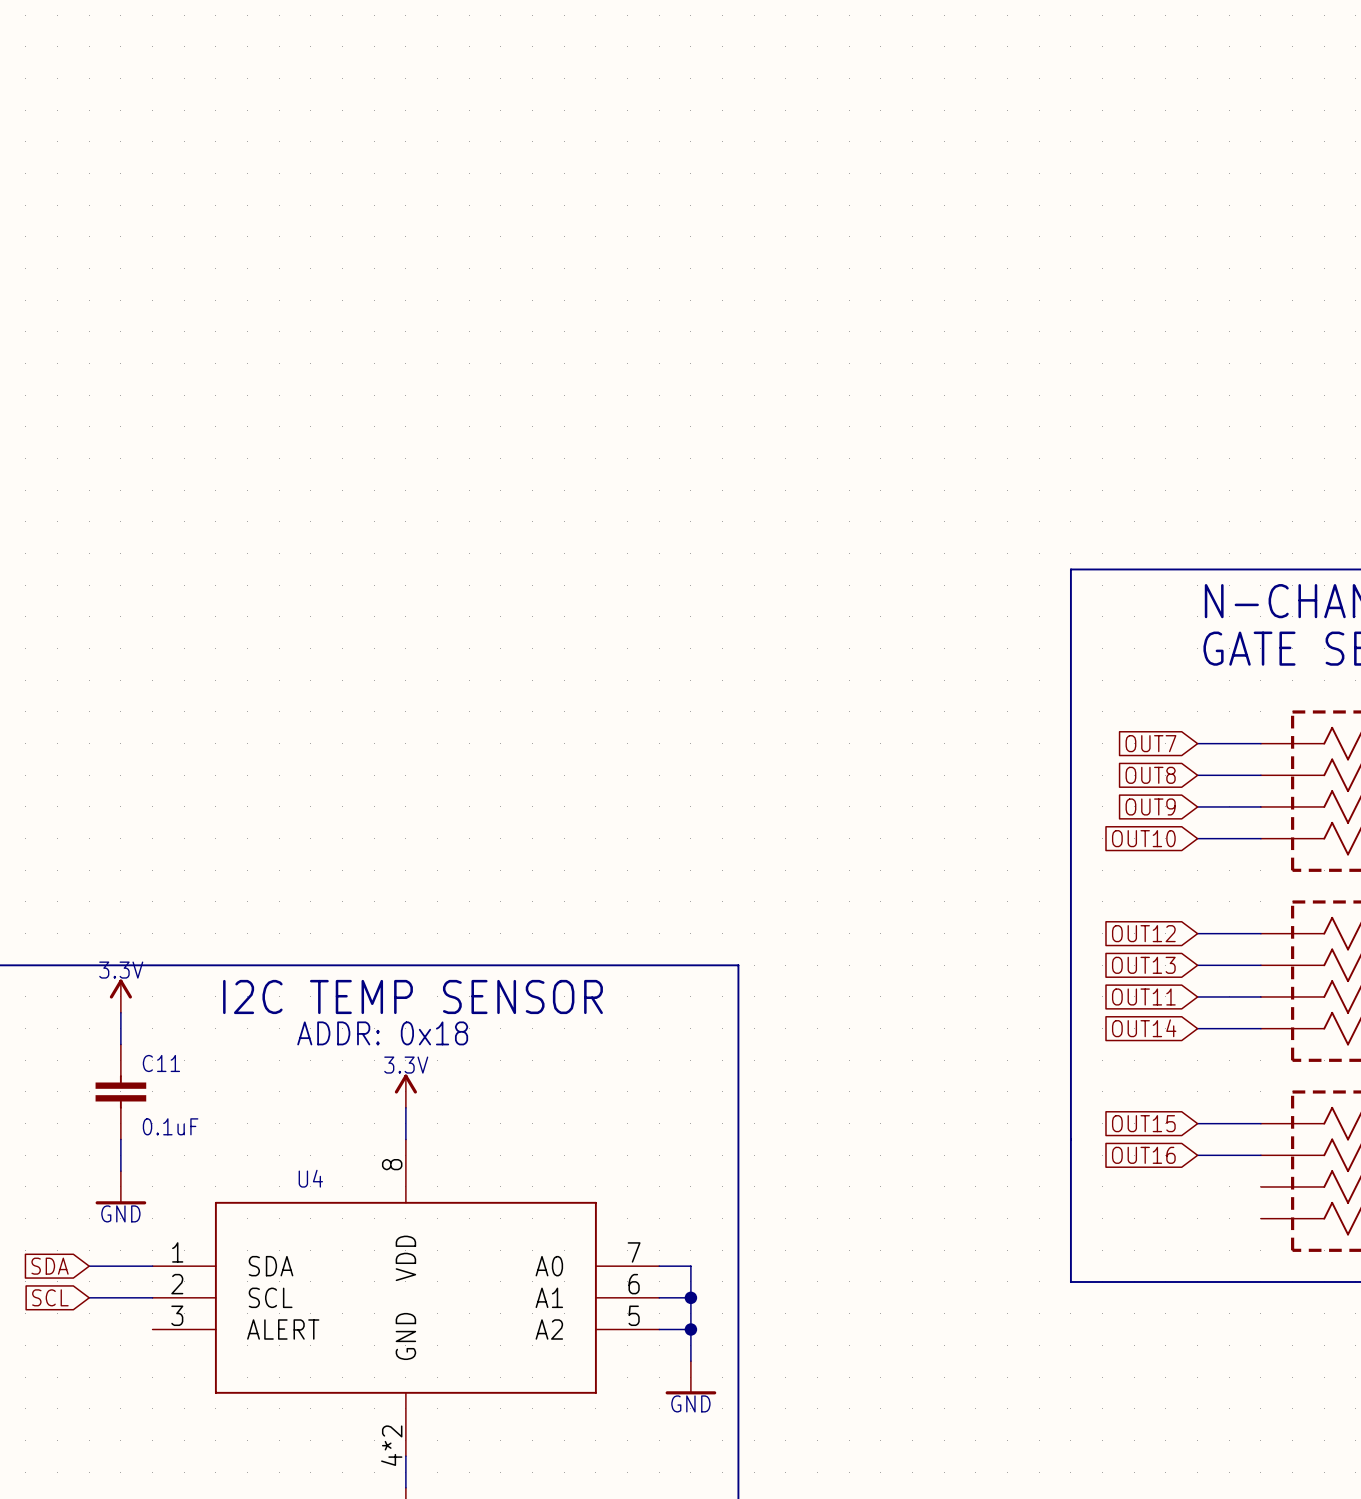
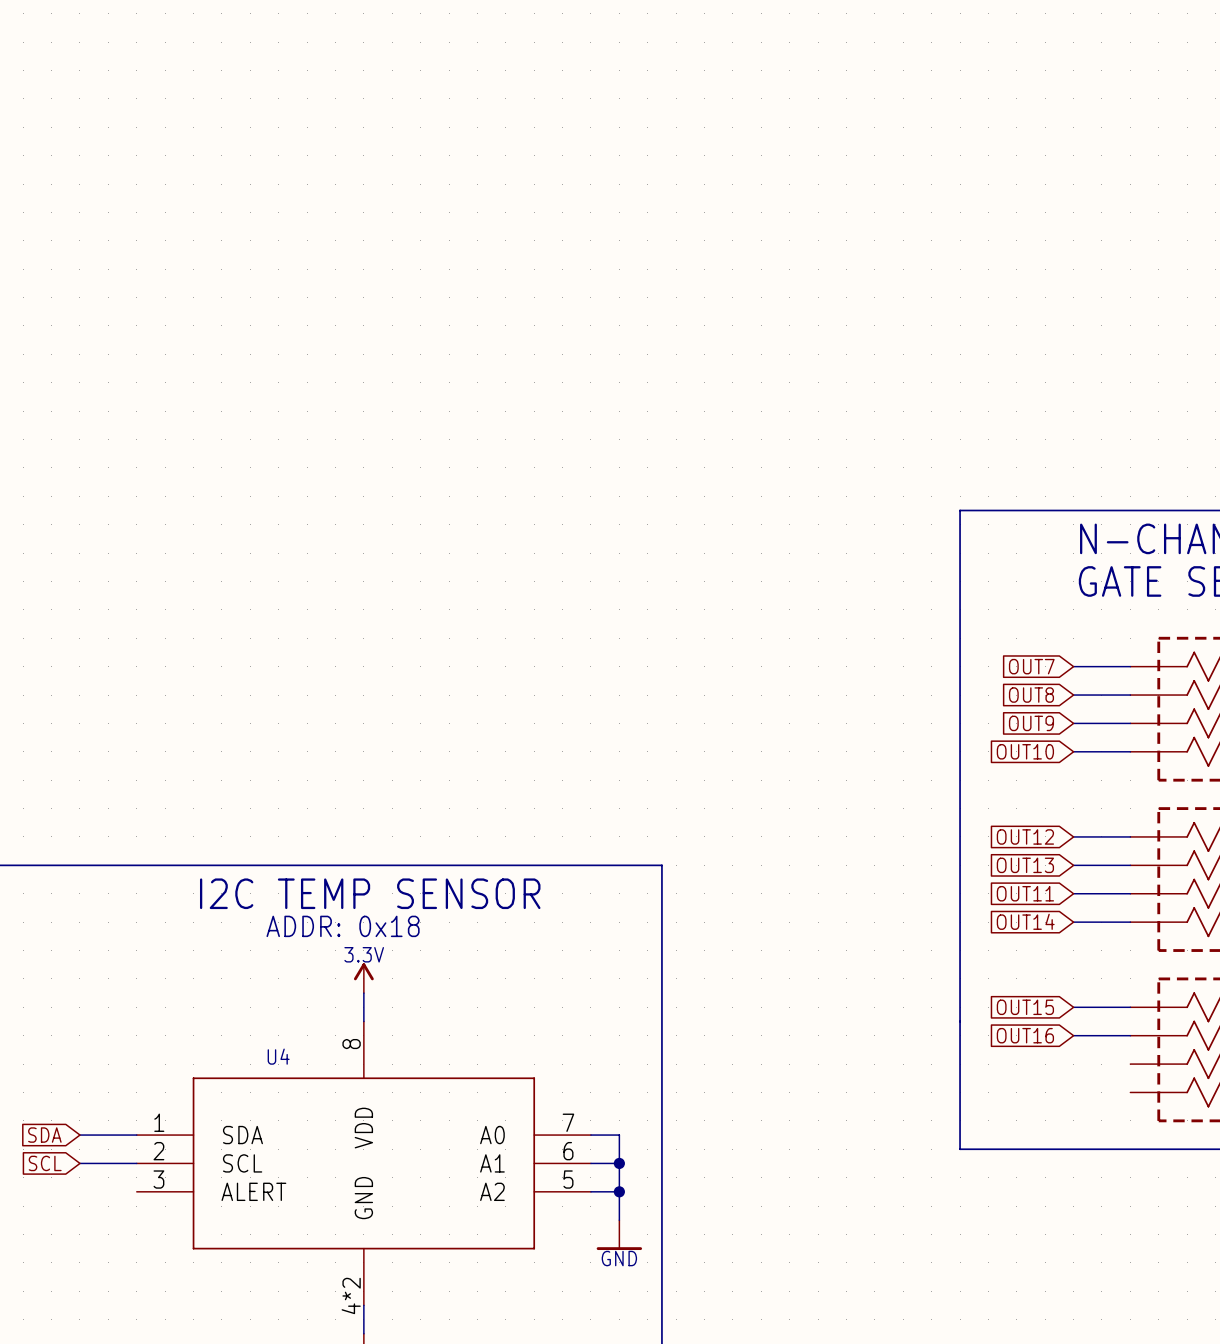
power symbol: 3.3V (120, 996) -> none
wire: (120, 1012) (120, 1044) -> none
C11: 0.1uF (120, 1091) -> none
wire: (120, 1139) (120, 1171) -> none
power symbol: GND (120, 1187) -> none

